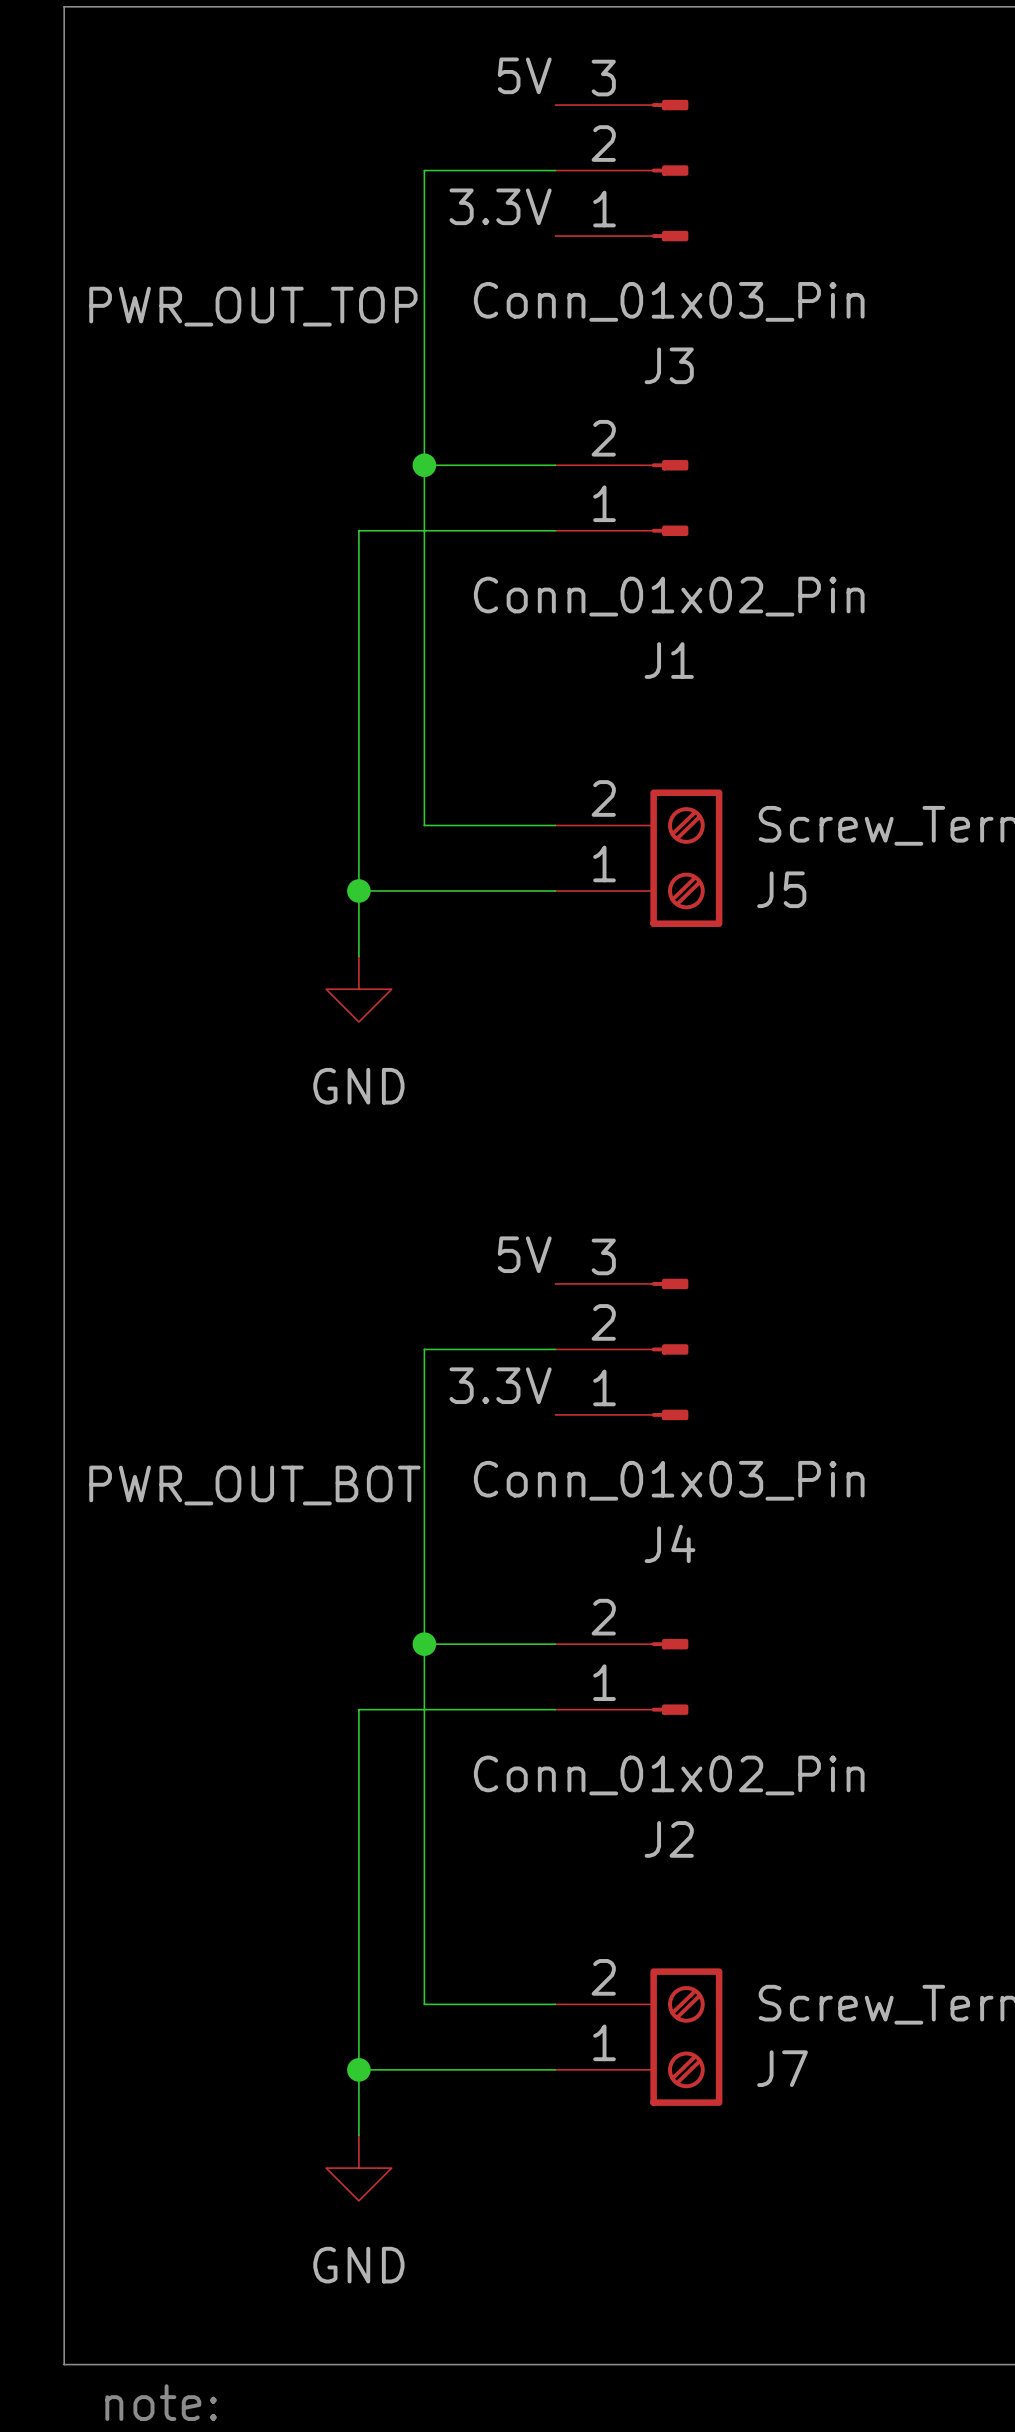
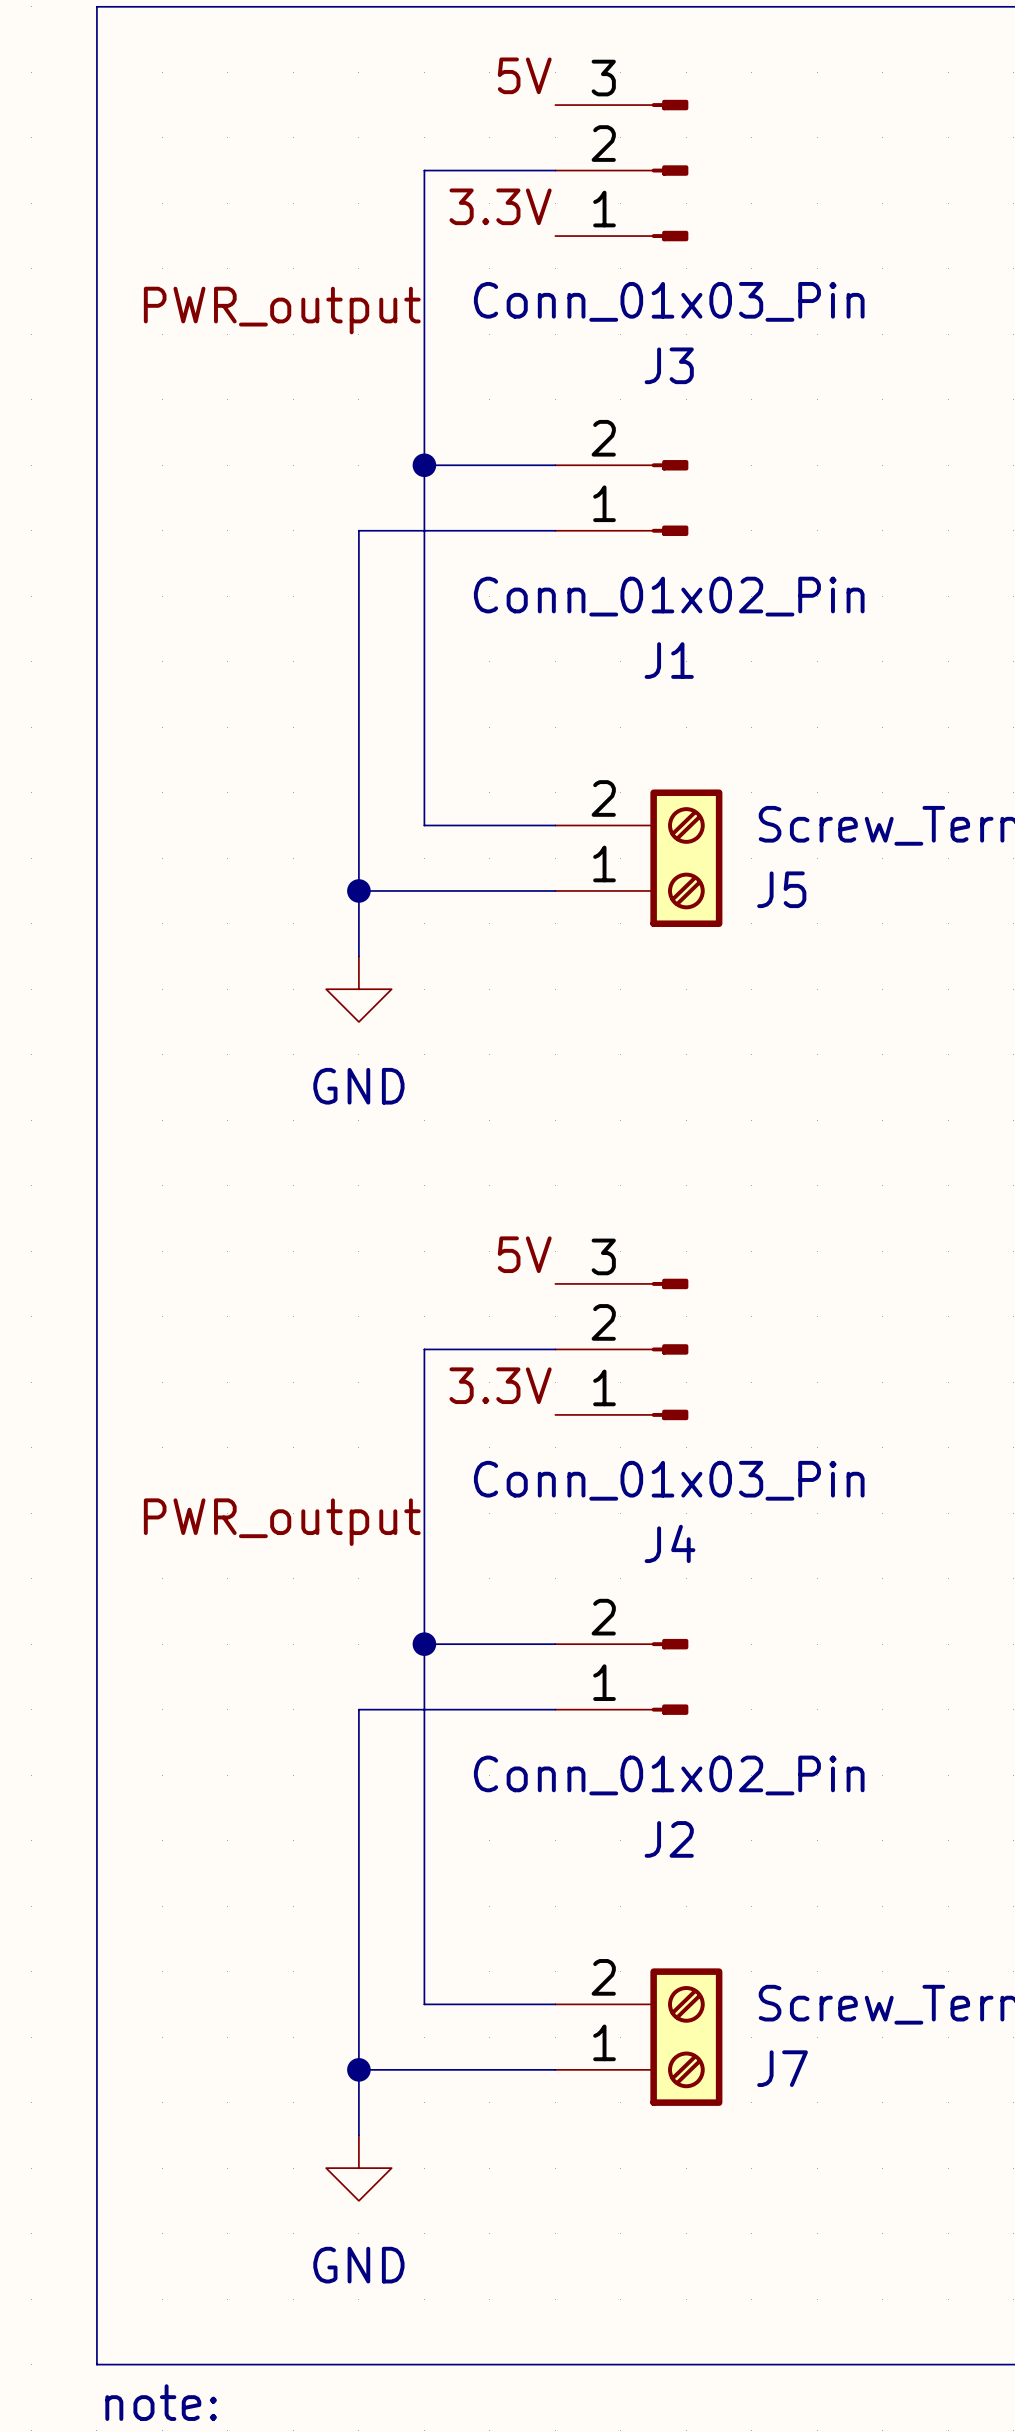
line: (96, 6) (64, 6) (64, 2364) (96, 2364) -> (96, 6) (96, 2364)
label: PWR_OUT_TOP (253, 306) -> PWR_output (282, 310)
label: PWR_OUT_BOT (254, 1485) -> none
label: none -> PWR_output (282, 1522)

